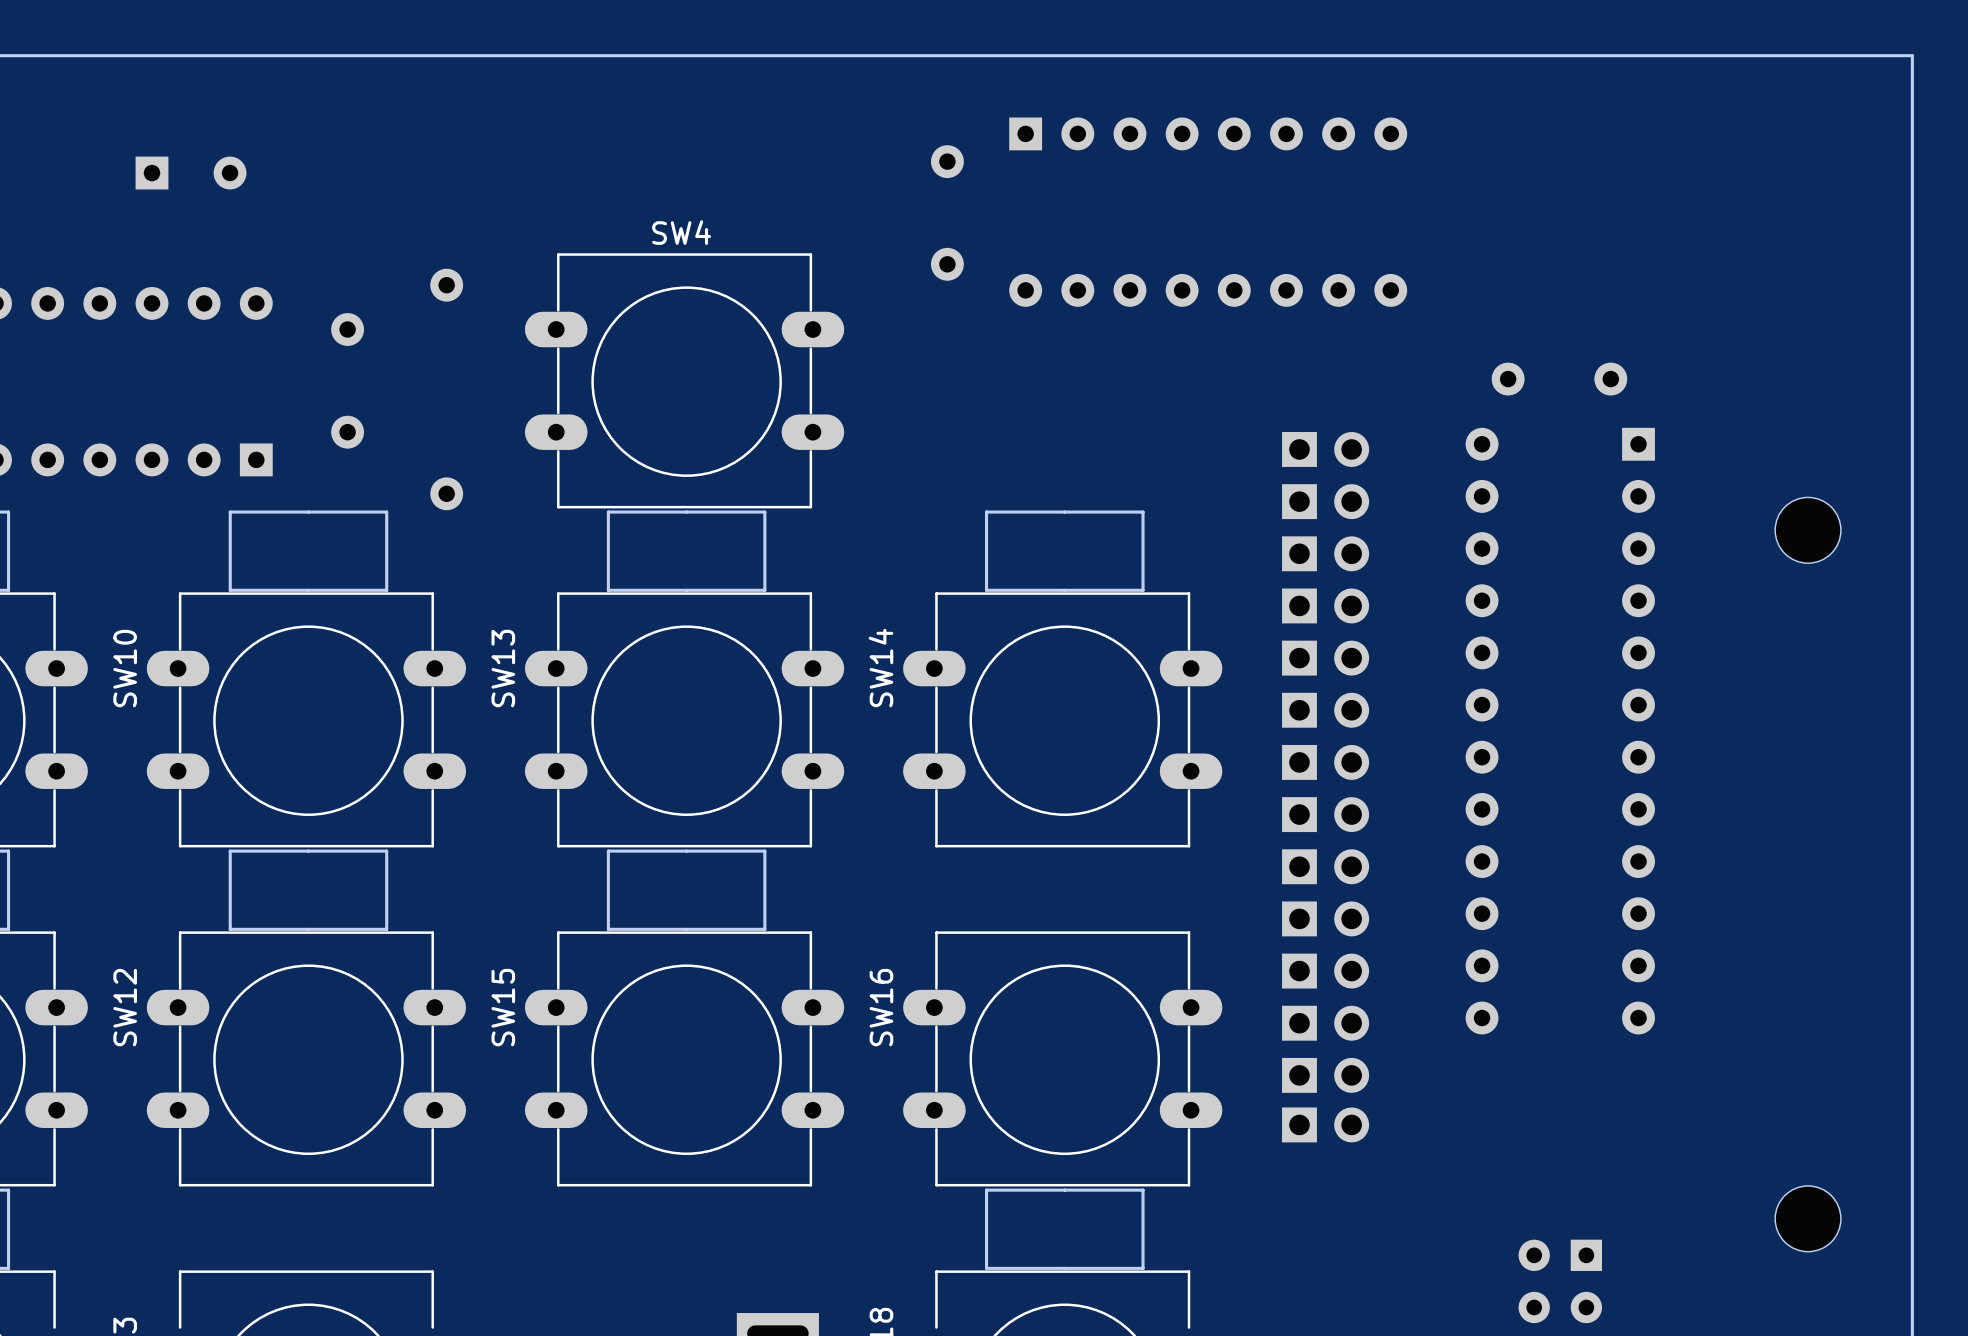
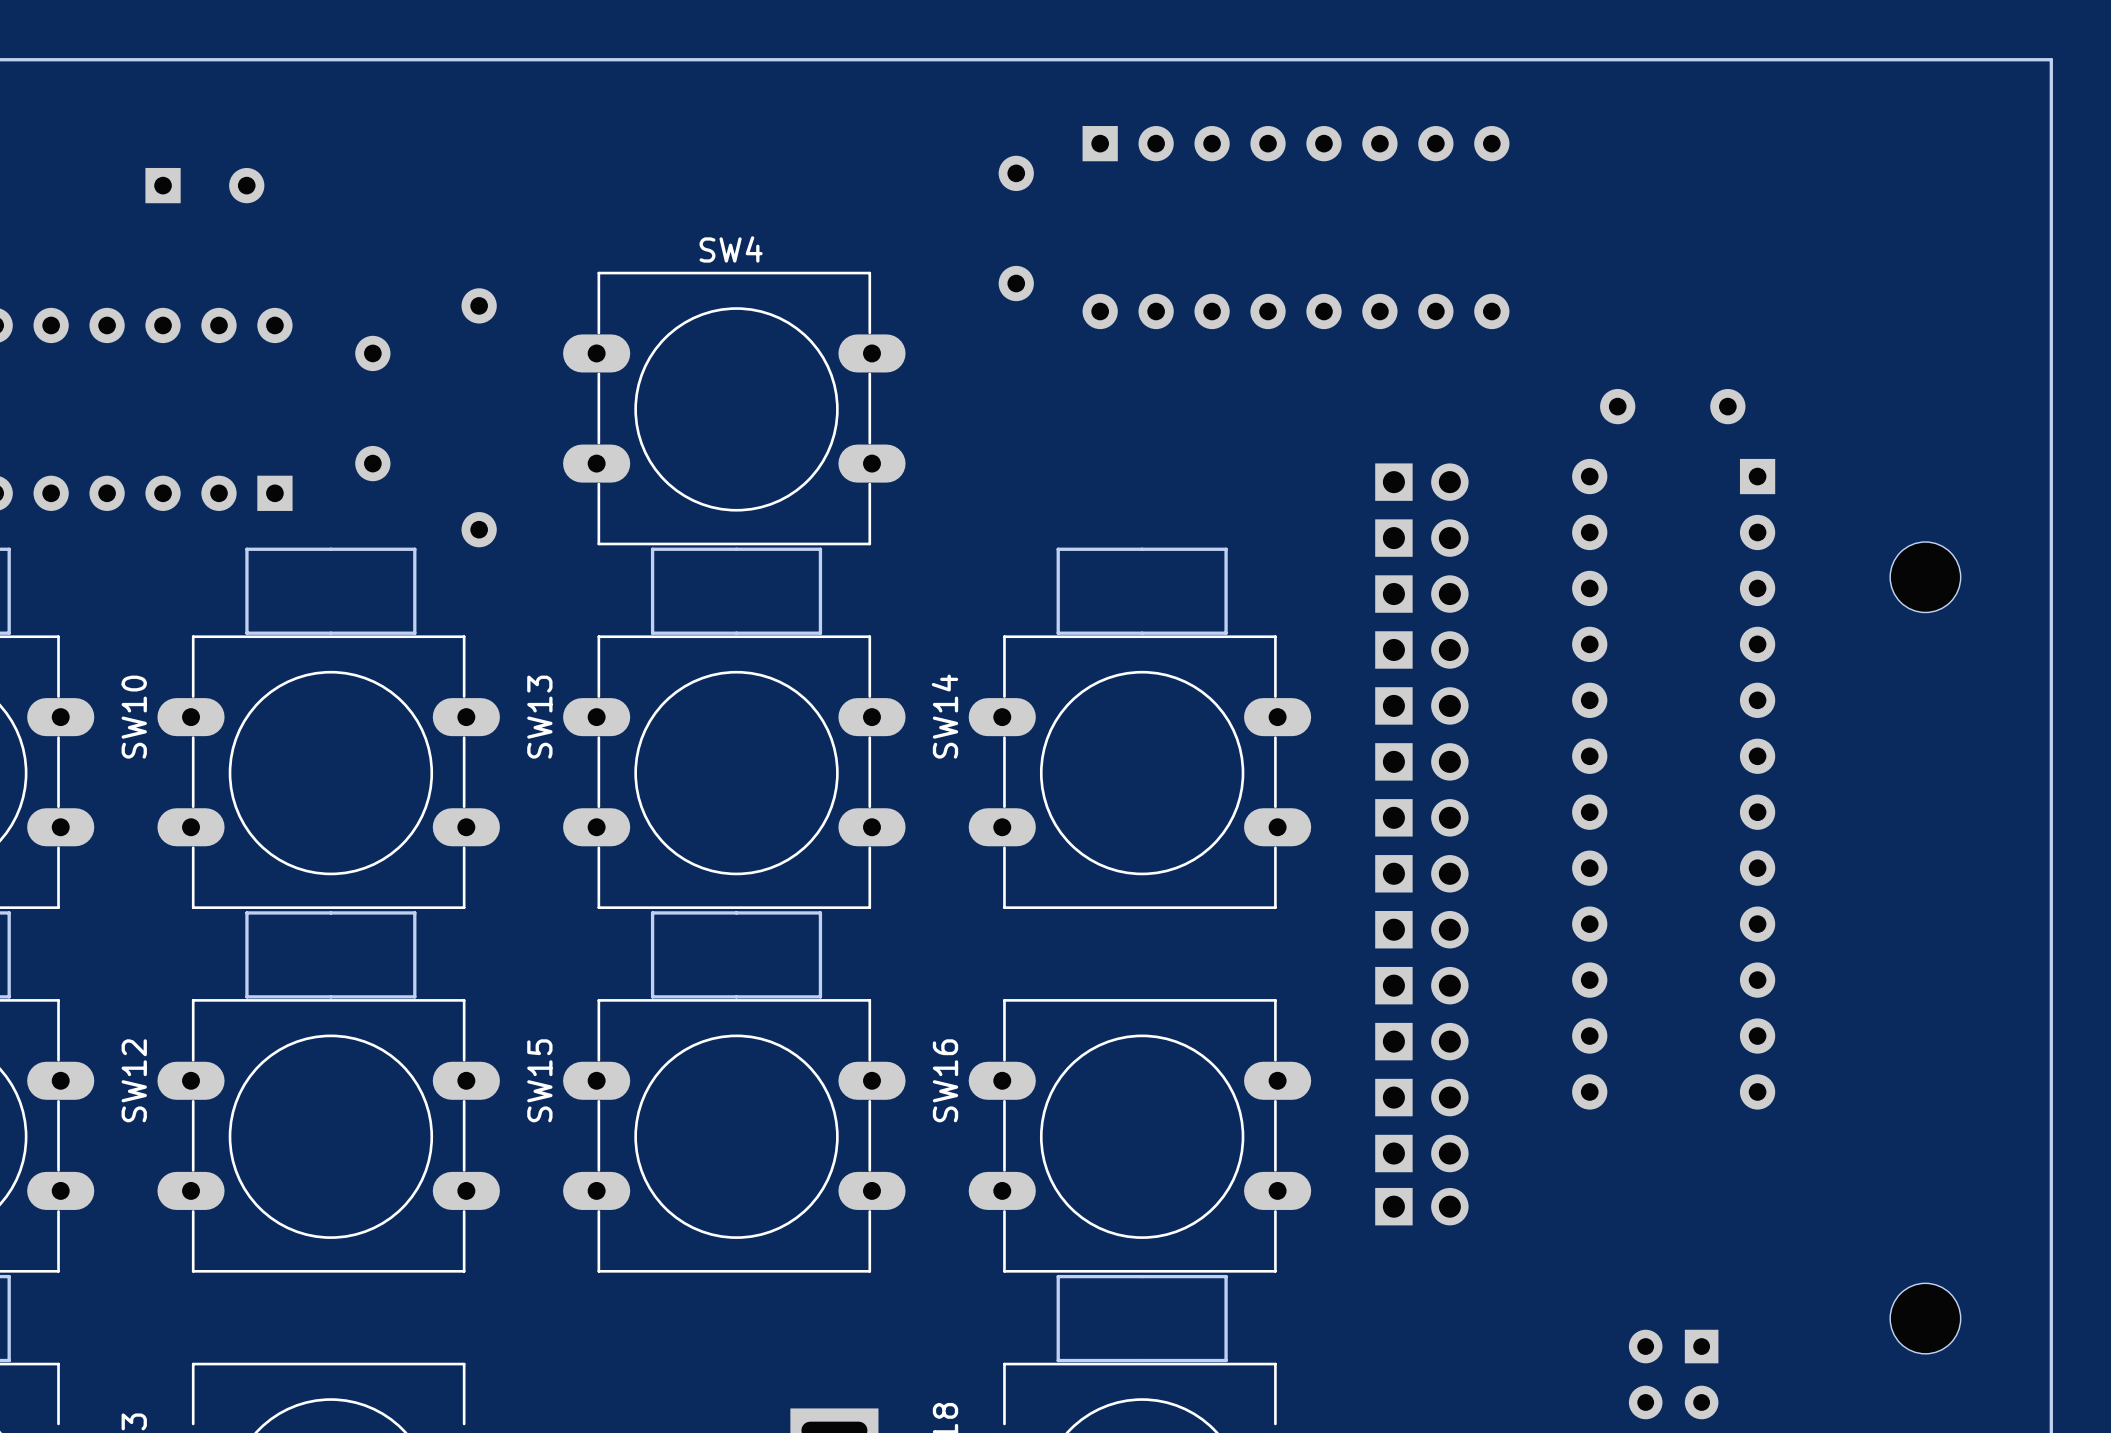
part position: (1808, 530) -> (1925, 577)
part position: (1808, 1218) -> (1925, 1318)

